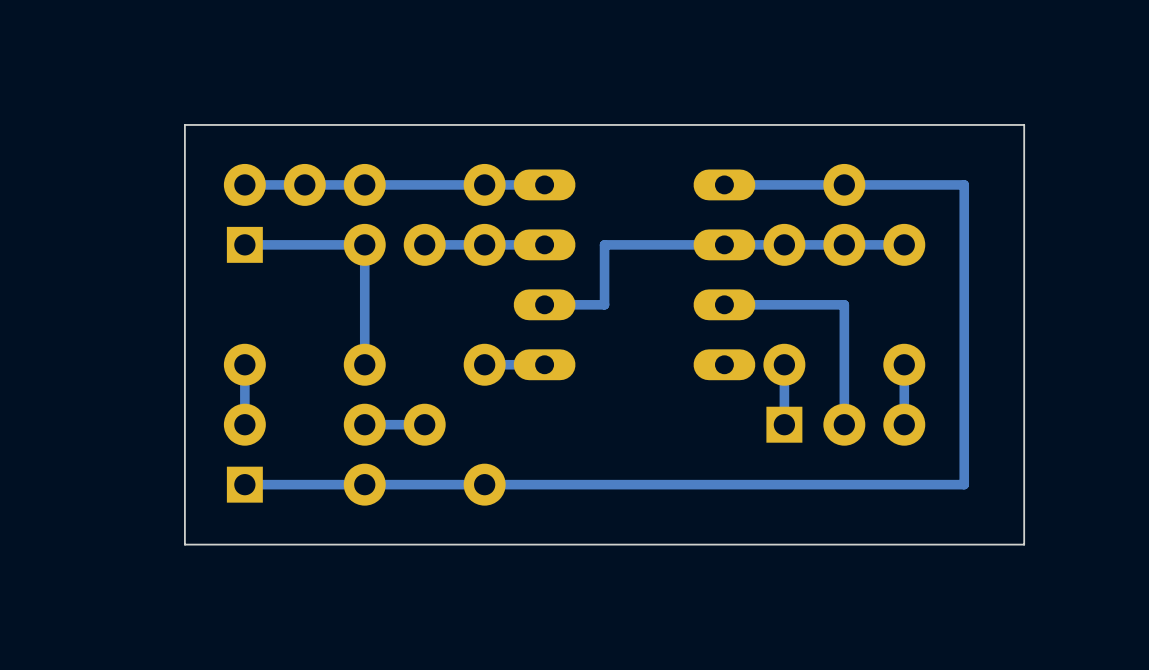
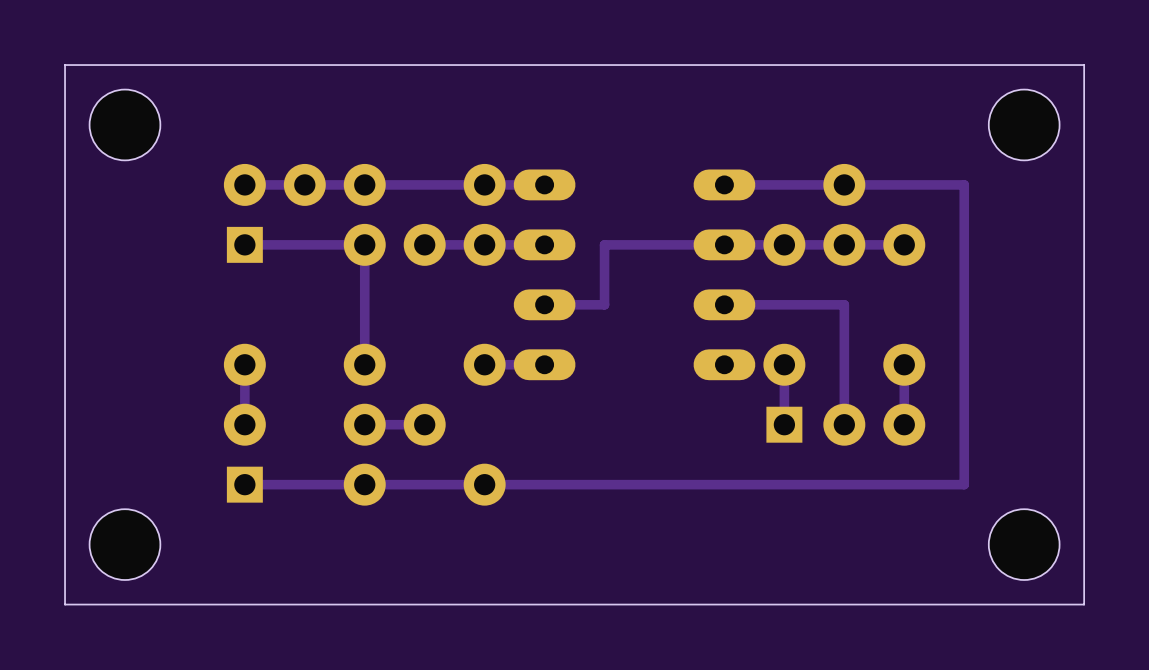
hole: none -> (124, 124)
board edge: (1024, 124) (184, 124) (184, 544) (1024, 544) (1024, 124) -> (1084, 65) (1084, 604) (65, 604) (65, 65) (1084, 65)
hole: none -> (1024, 124)
hole: none -> (124, 544)
hole: none -> (1024, 544)

